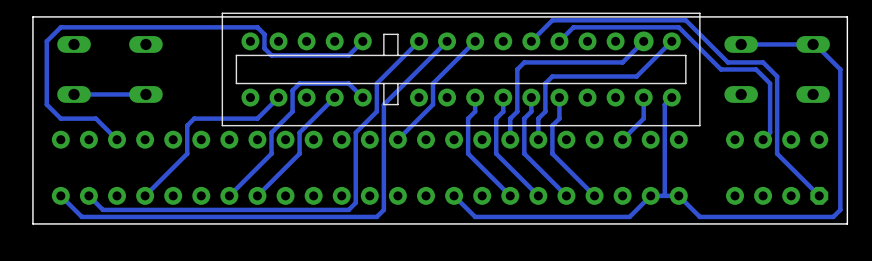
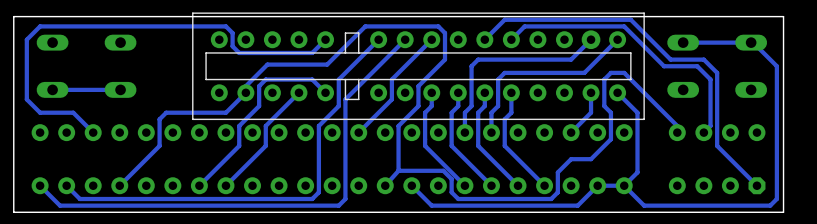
track: none -> (245, 92) (245, 86) (267, 64) (327, 64) (365, 26) (438, 26) (445, 33) (445, 59) (418, 86) (418, 106) (398, 125) (398, 170)
track: (671, 97) (664, 104) (664, 118) -> (677, 132) (677, 125) (624, 72) (610, 72) (604, 79) (604, 106) (610, 112)
track: none -> (617, 92) (637, 112) (637, 172) (624, 185)
track: (664, 146) (664, 195) -> (610, 139) (591, 159) (571, 159) (557, 172) (557, 192) (551, 199) (458, 199) (451, 192) (451, 179) (443, 170) (398, 170)
track: none -> (398, 170) (385, 185)

